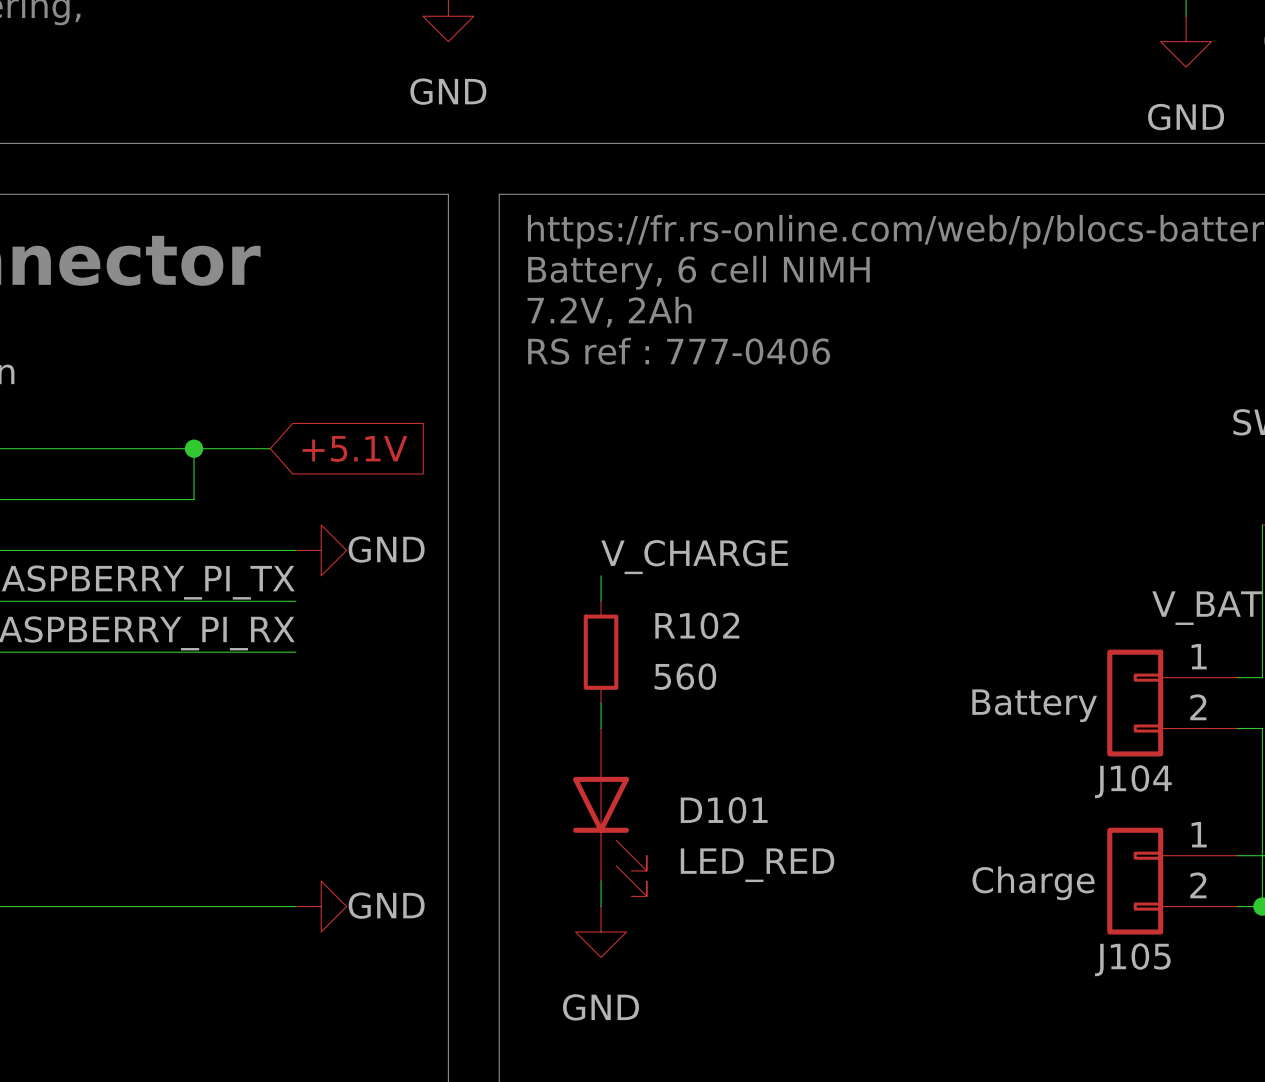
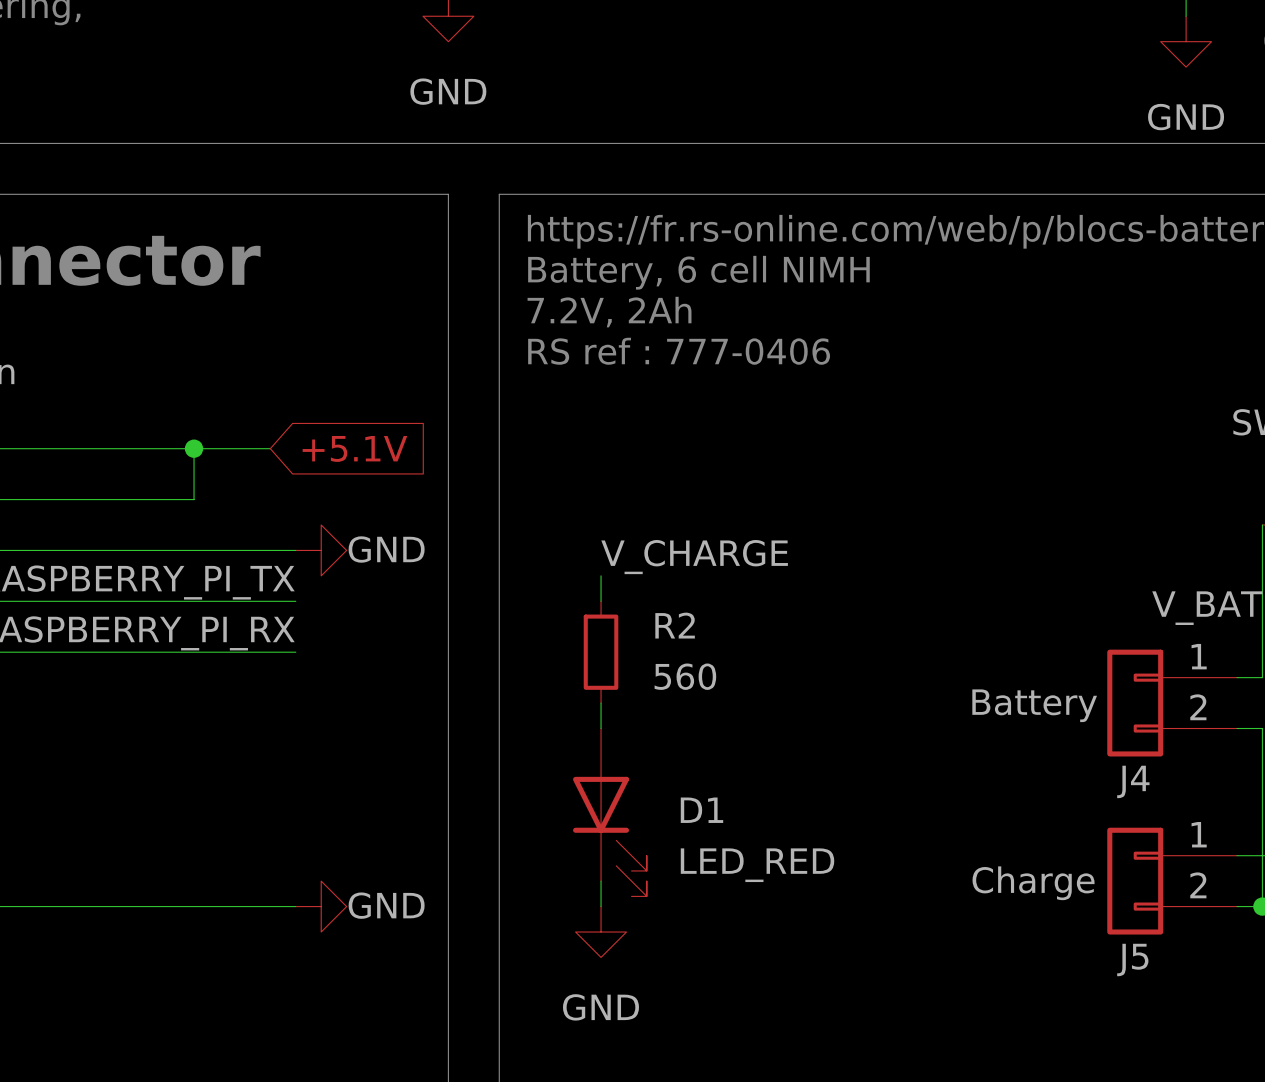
R102 name: R102 (697, 625) -> R2 (675, 625)
J104 name: J104 (1133, 781) -> J4 (1133, 781)
D101 name: D101 (724, 810) -> D1 (701, 810)
J105 name: J105 (1132, 959) -> J5 (1132, 959)

